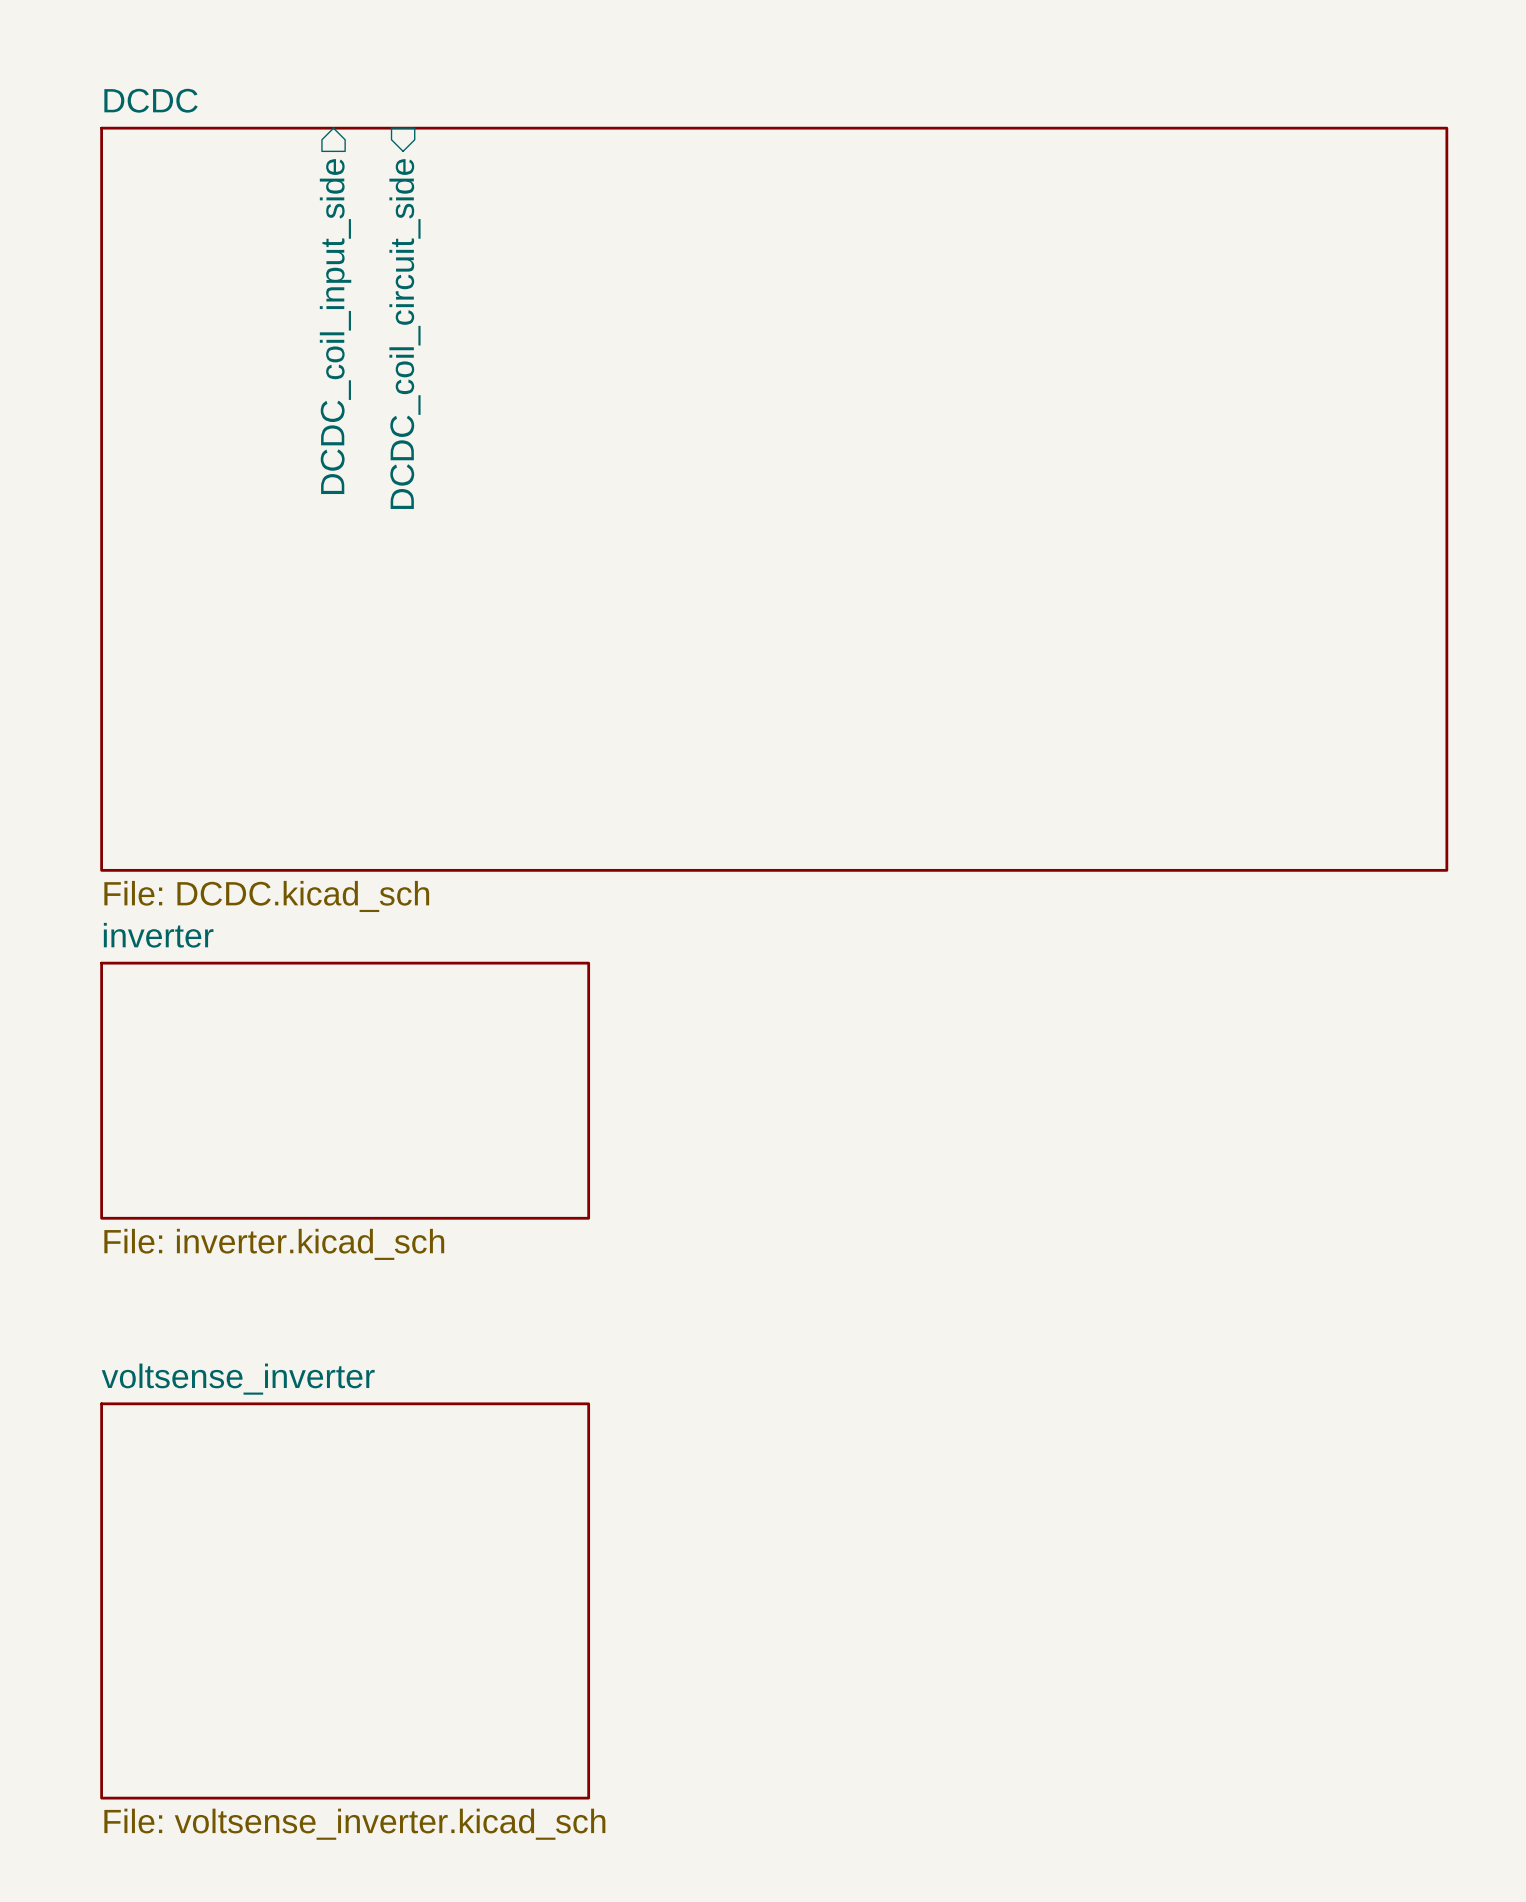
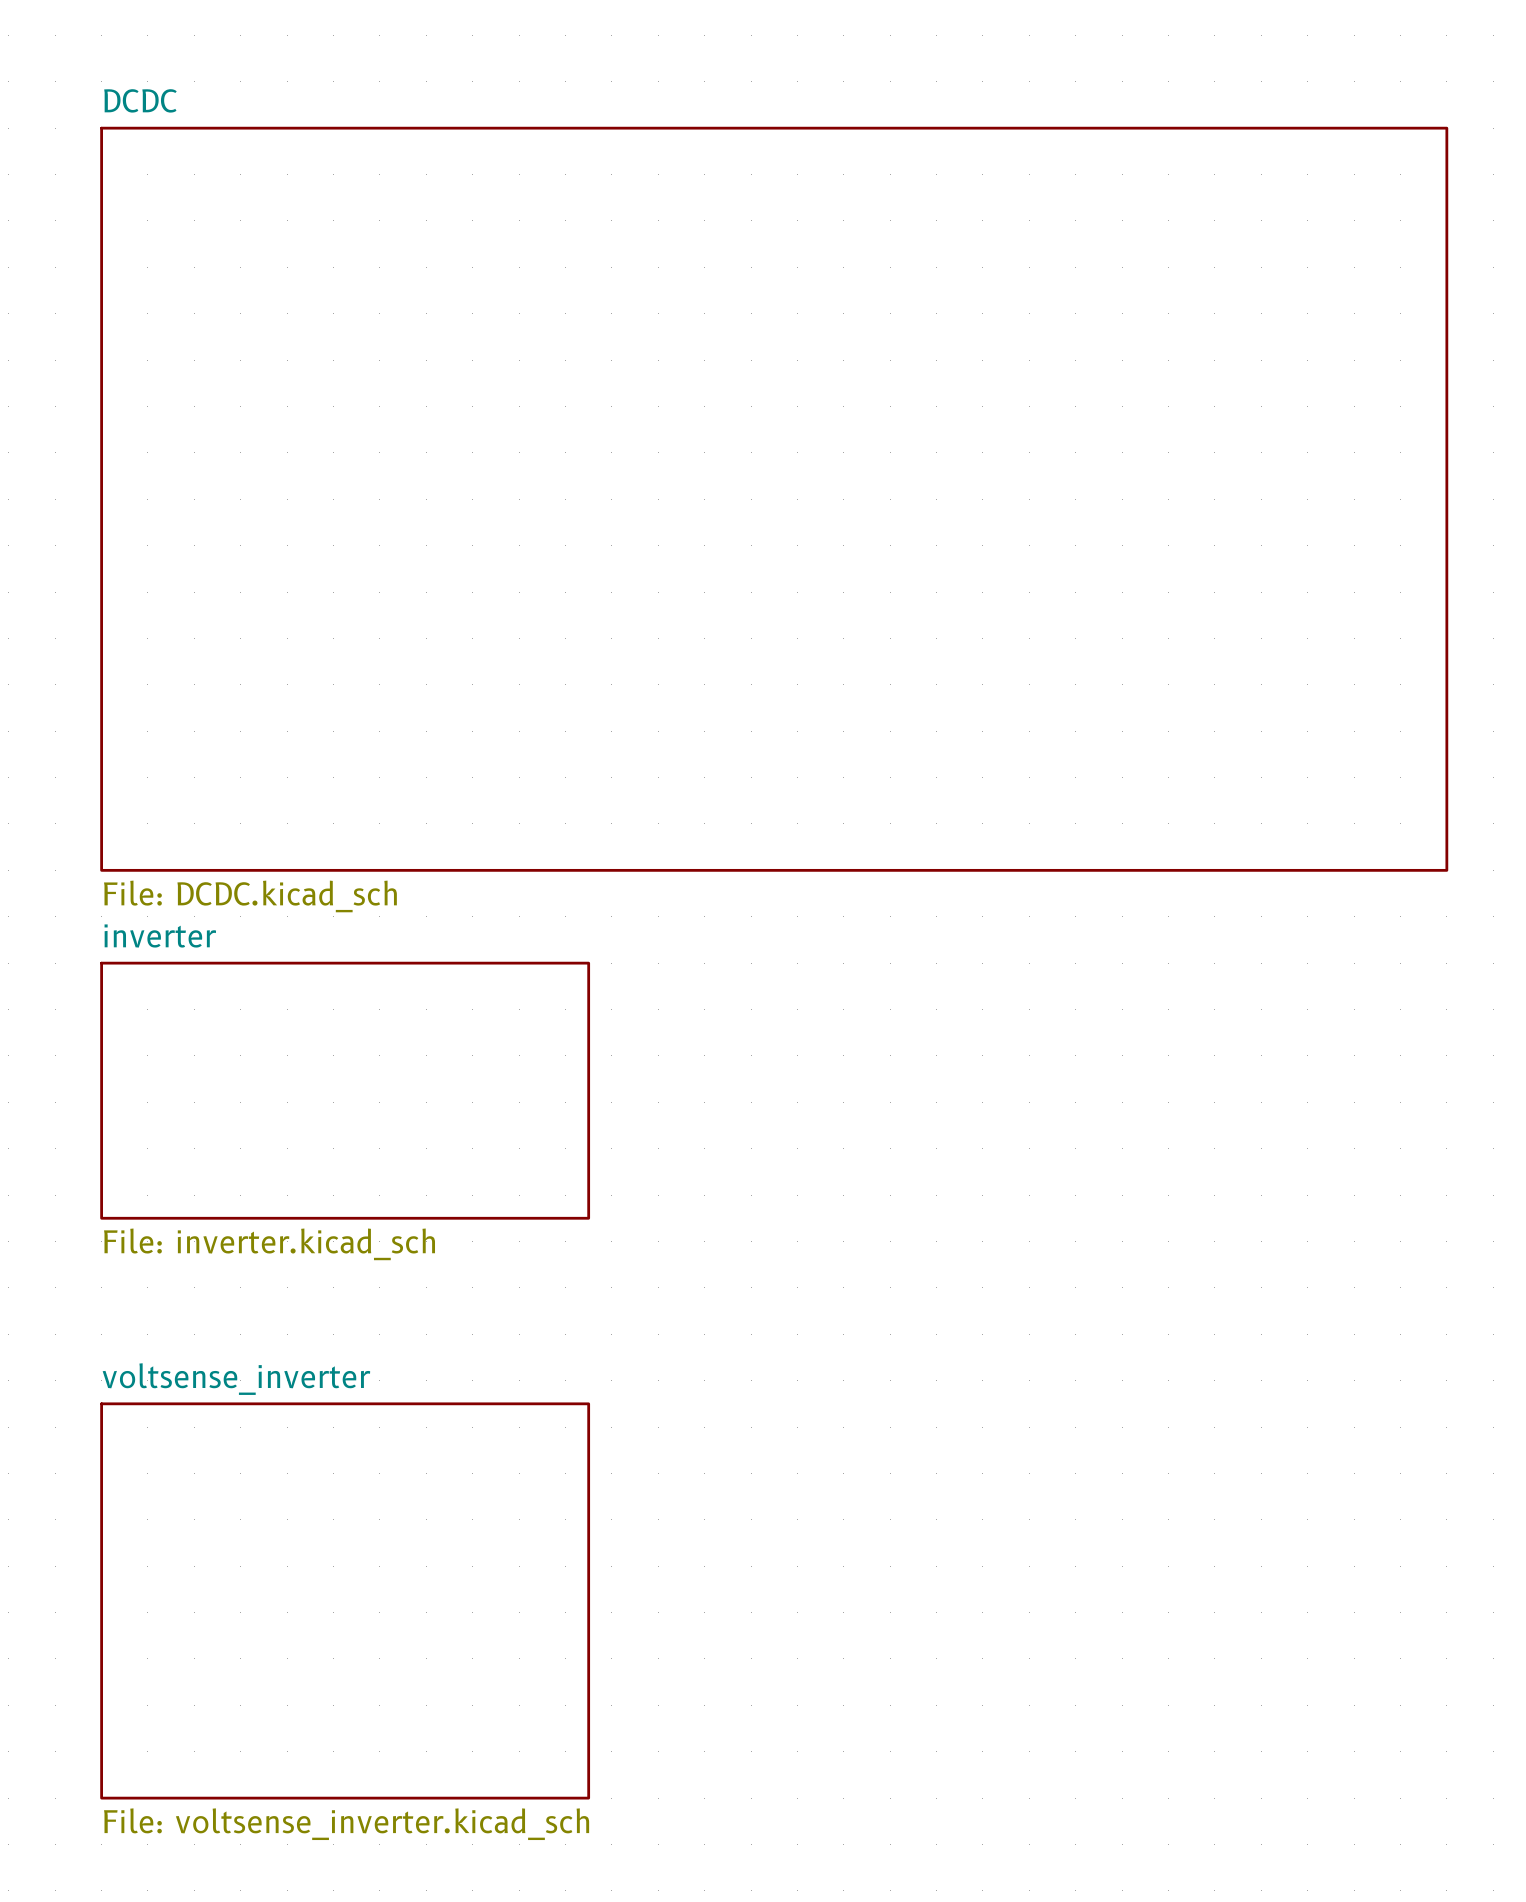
sheet pin: DCDC_coil_input_side (335, 326) -> none
sheet pin: DCDC_coil_circuit_side (404, 334) -> none

